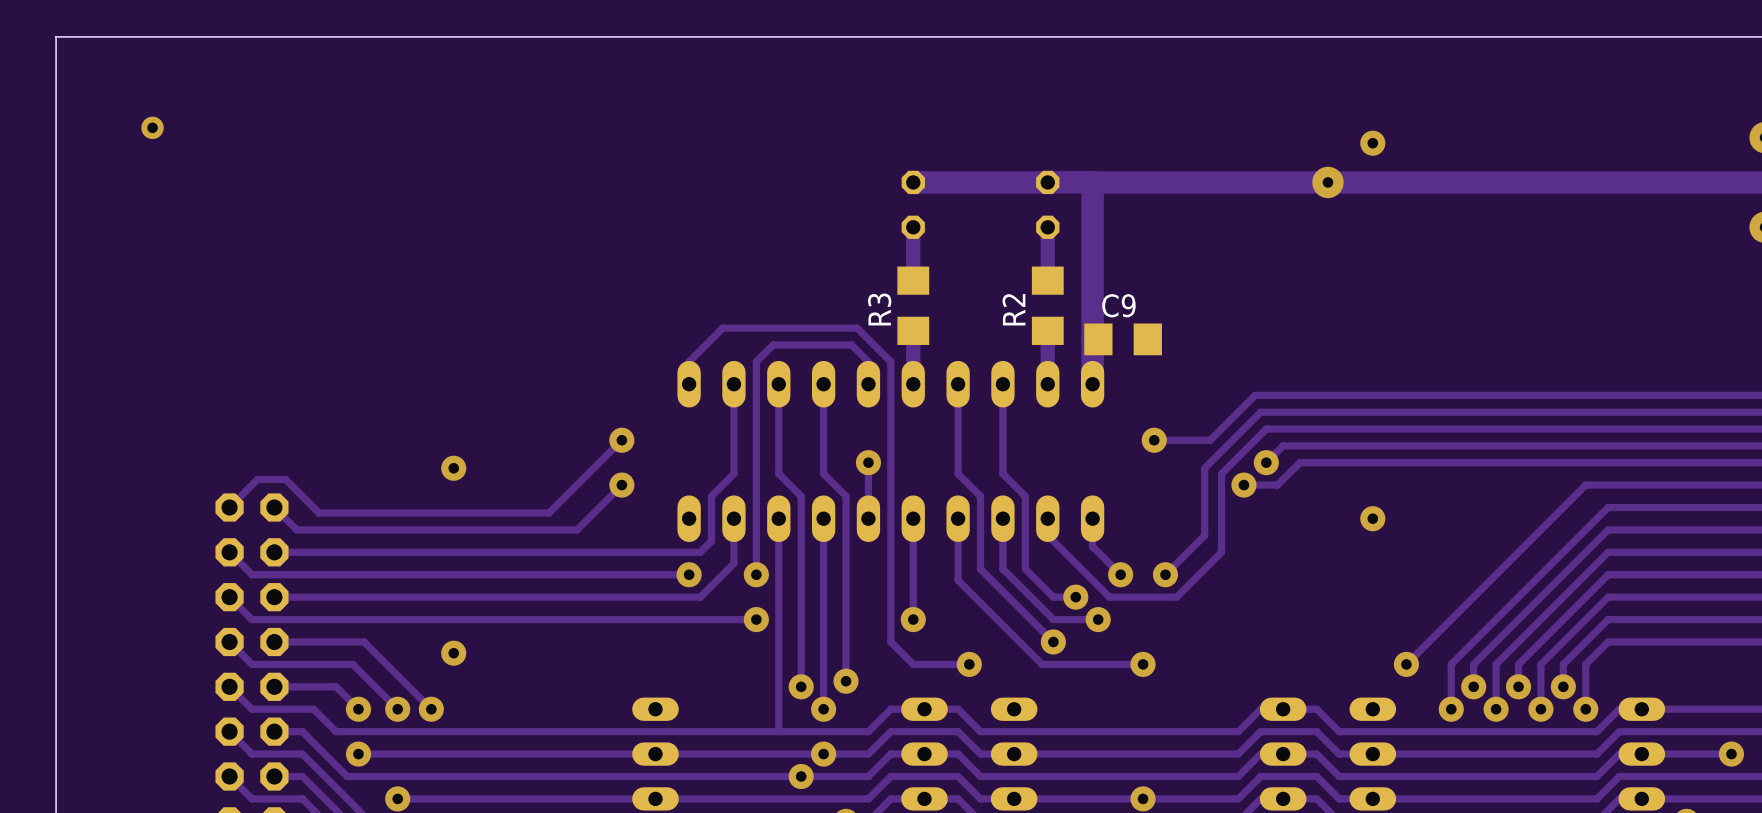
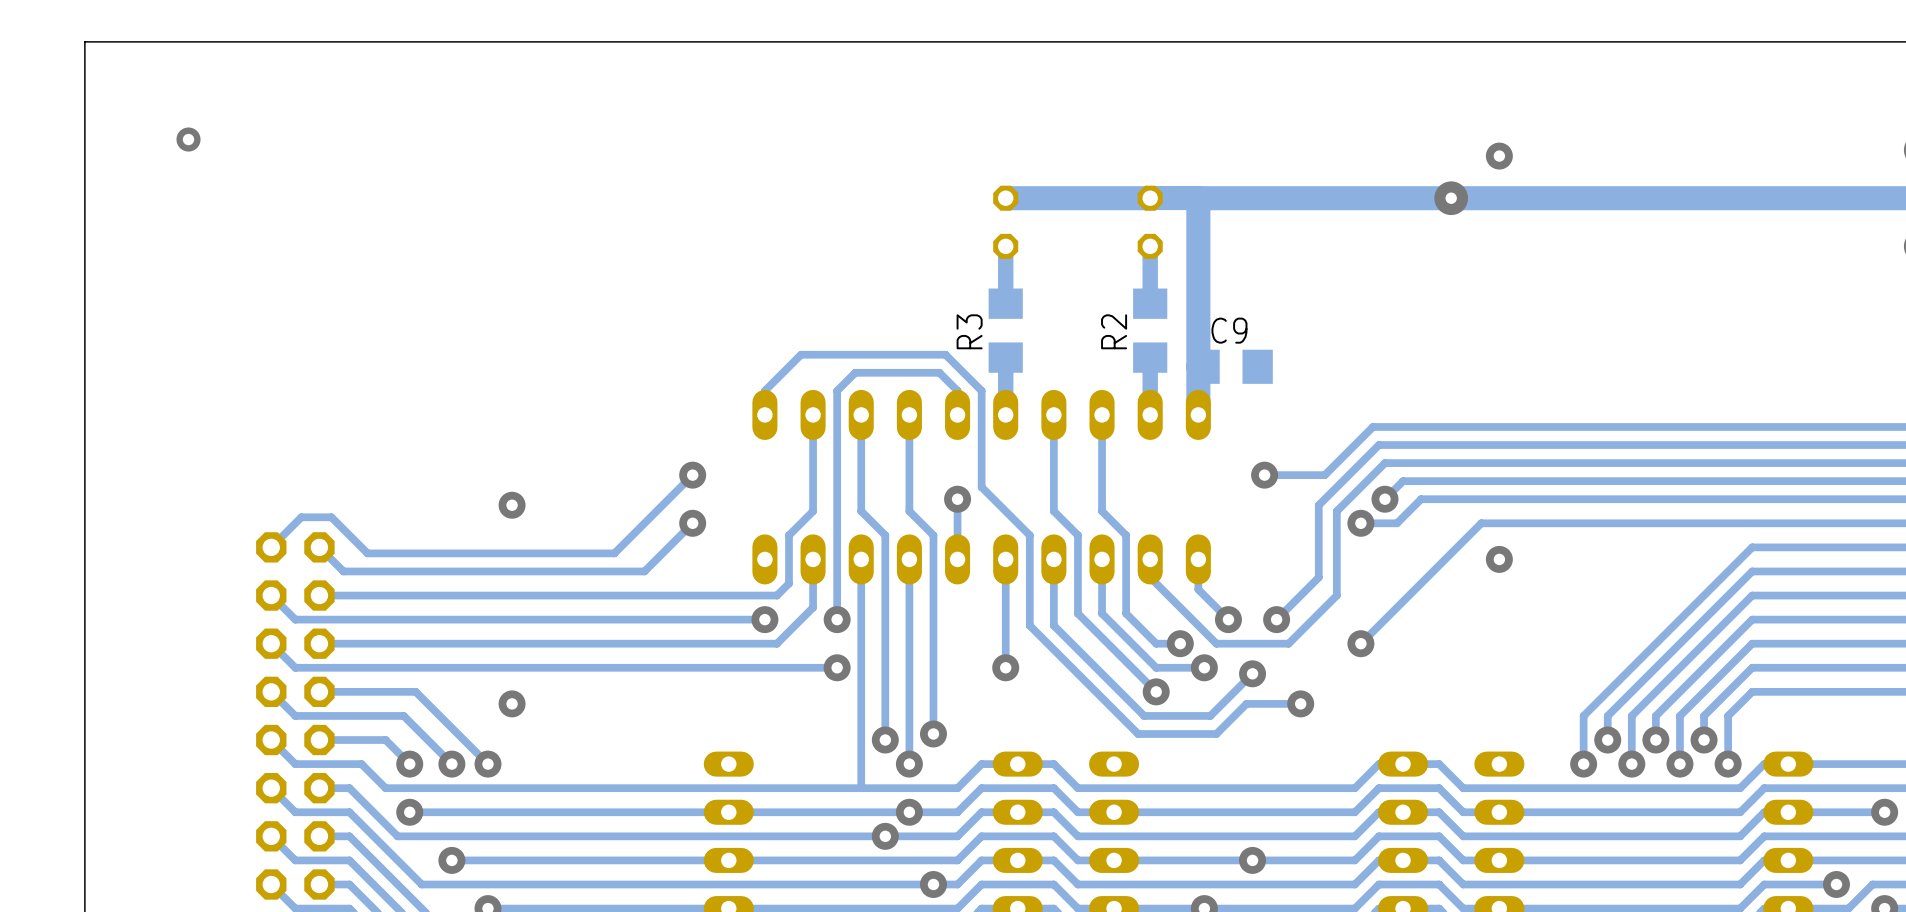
track: (890, 451) (890, 641) (913, 664) (969, 664) -> (981, 487) (1029, 535) (1029, 625) (1138, 734) (1216, 734) (1246, 703) (1300, 703)
track: (1585, 485) (1406, 664) -> (1728, 523) (1481, 523) (1360, 643)
via: none -> (1360, 643)
via: none -> (1252, 673)
via: none -> (1300, 703)
via: (969, 664) -> none
track: (1143, 664) (1103, 664) -> (1252, 673) (1210, 715)
via: (1143, 664) -> none
via: (1406, 664) -> none

